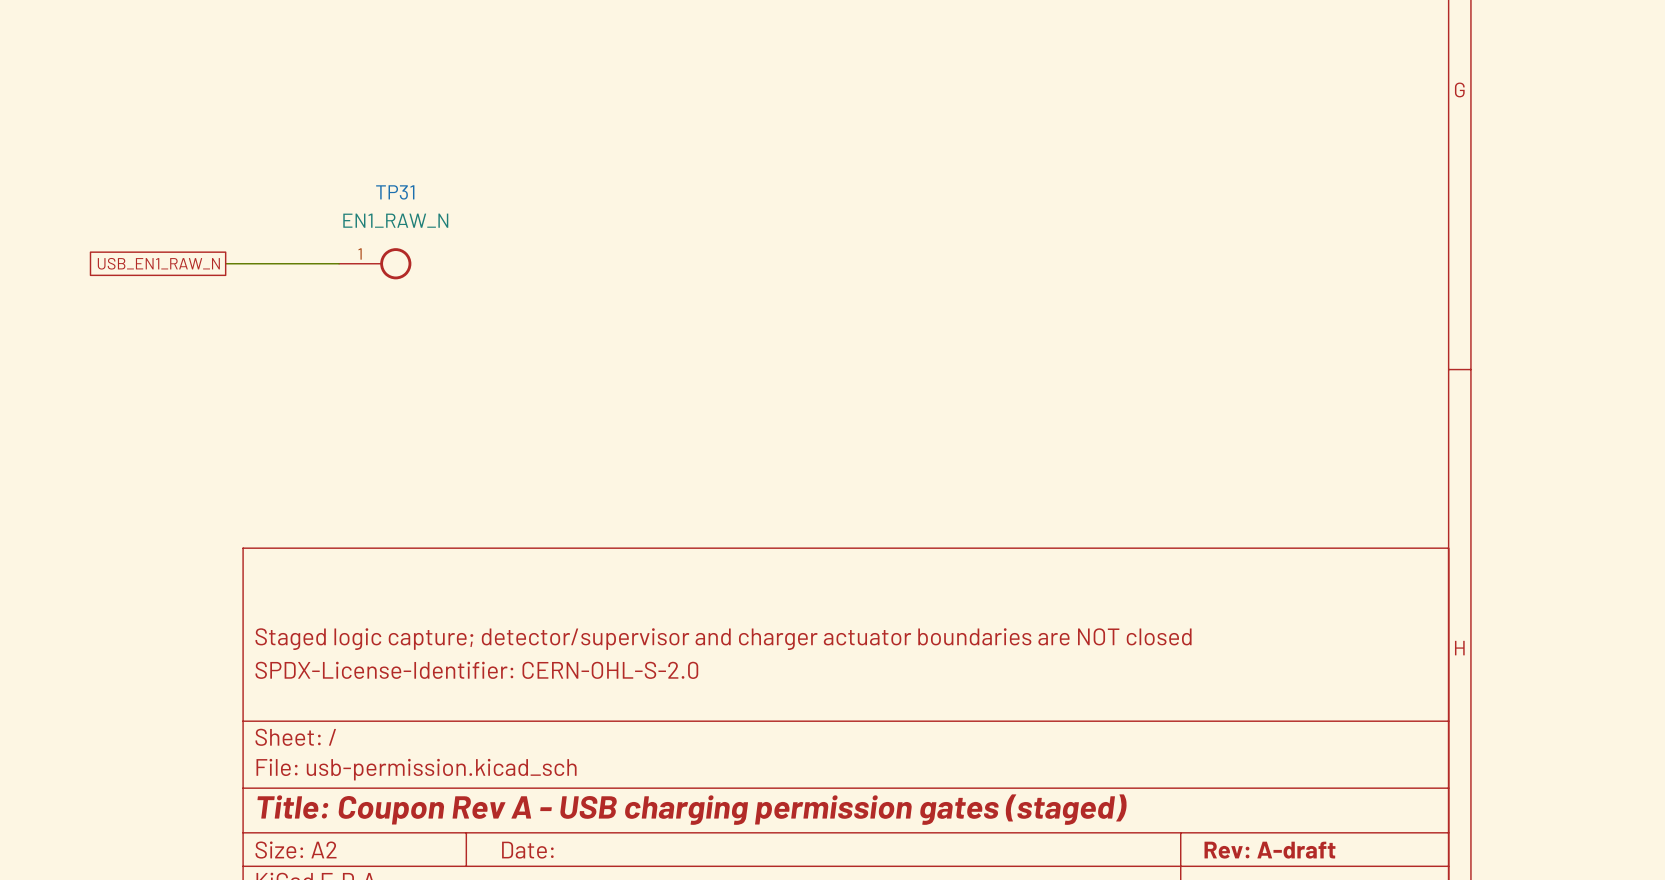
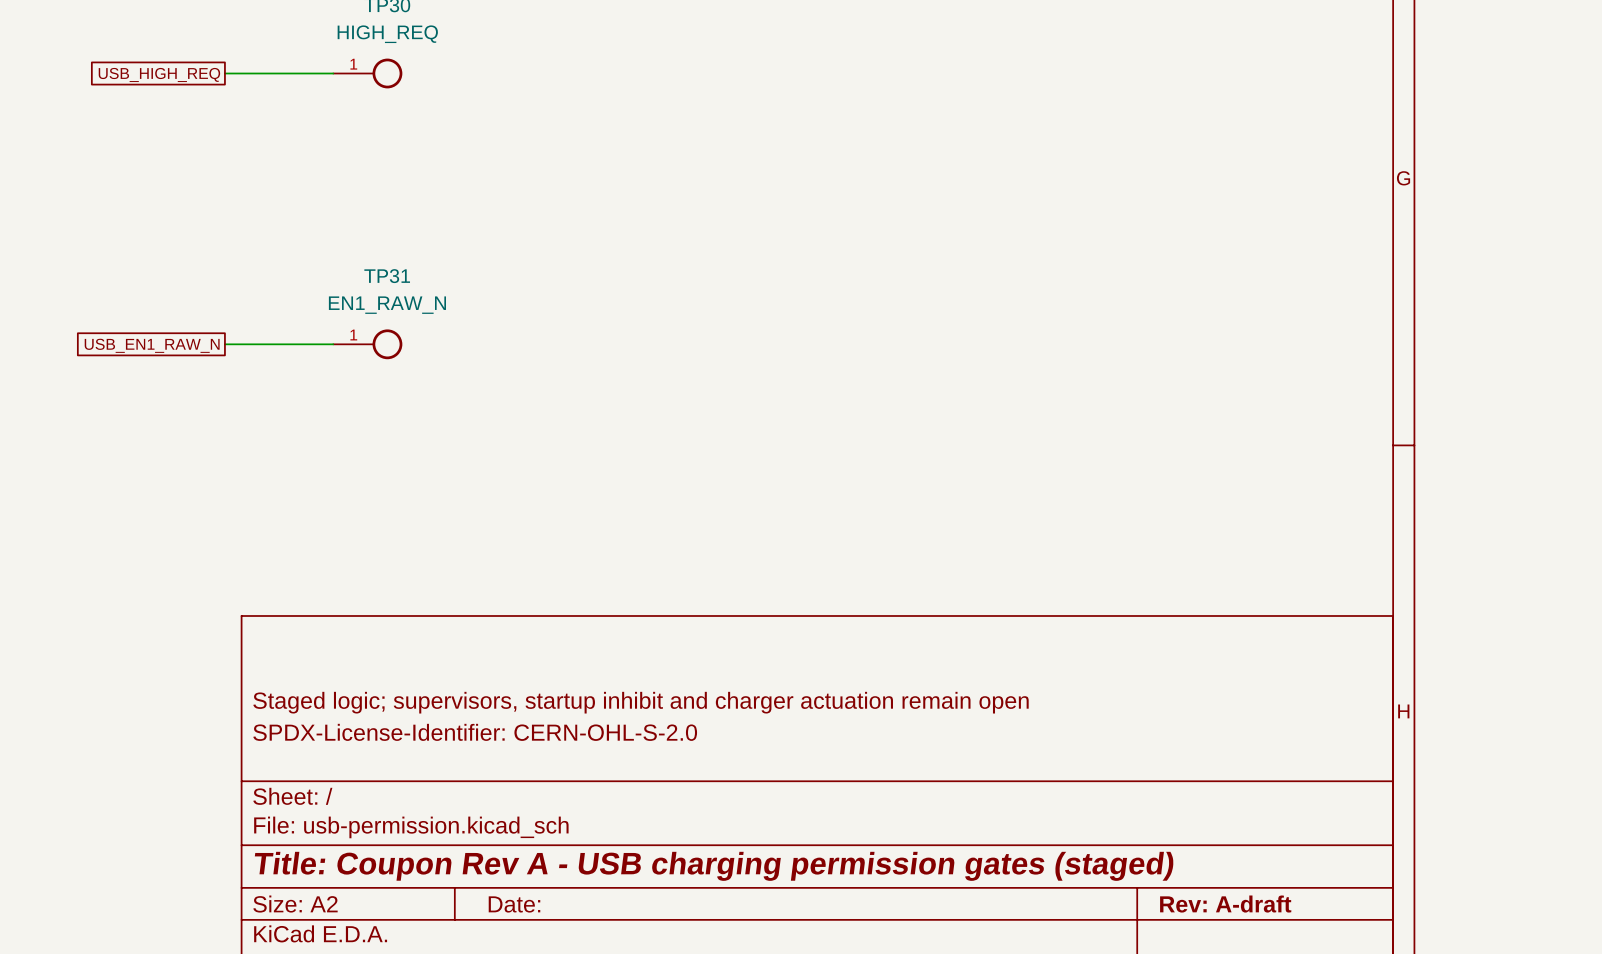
title block: Staged logic capture; detector/supervisor and charger actuator boundaries are NOT closed (723, 639) -> Staged logic; supervisors, startup inhibit and charger actuation remain open (640, 702)

